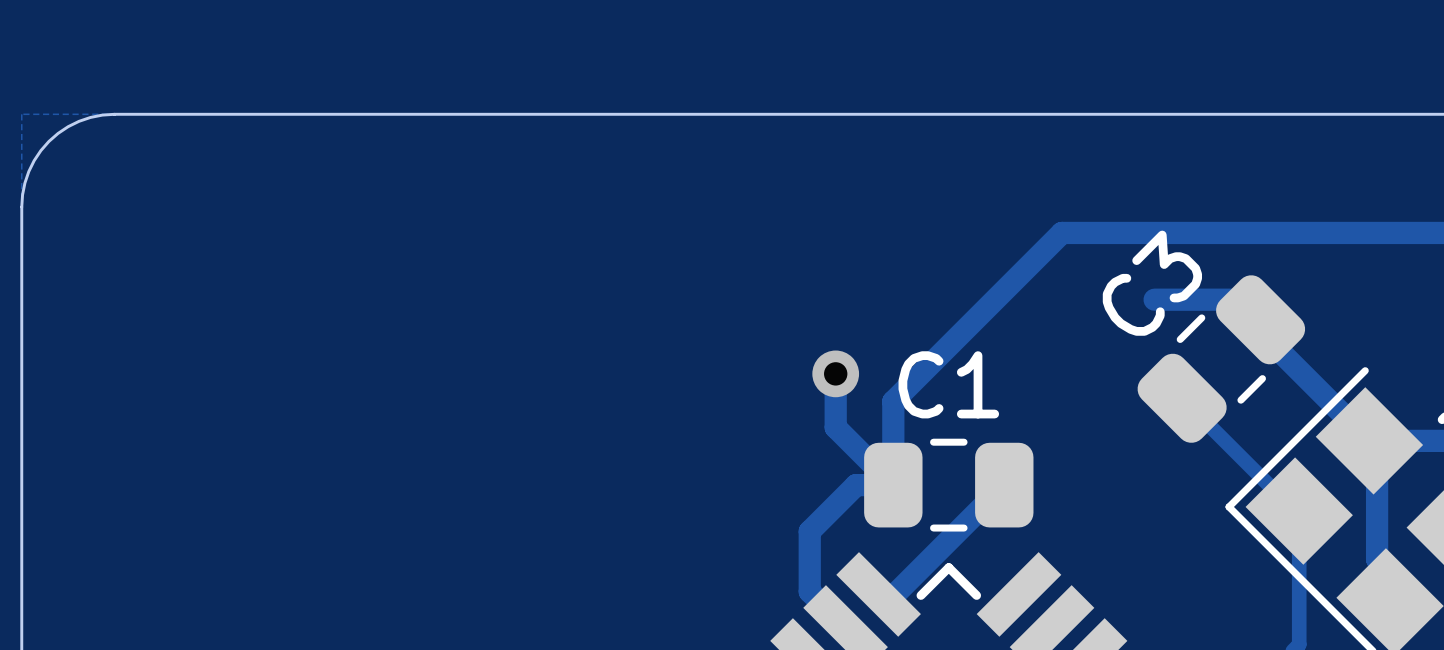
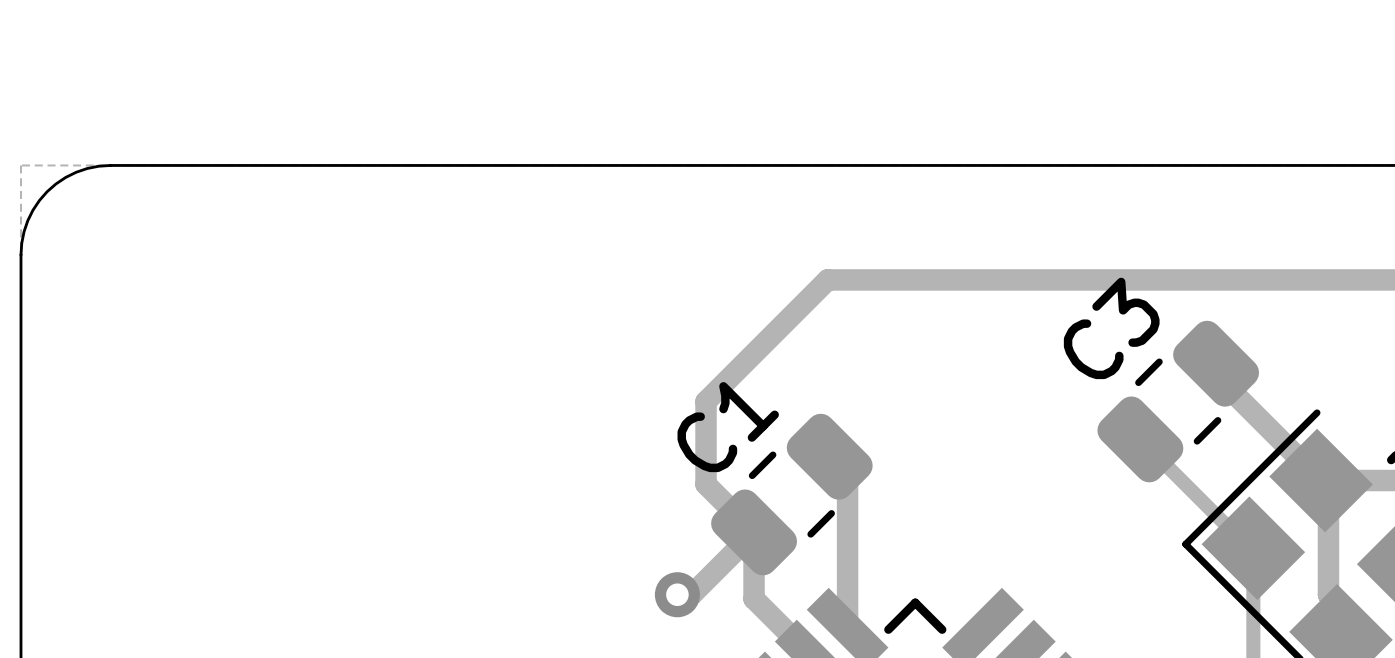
track: (1061, 232) (893, 401) (893, 485) -> (1024, 279) (827, 279) (706, 401) (706, 484) (754, 532)
track: (1154, 299) (1243, 299) (1260, 316) (1260, 319) -> none
track: (835, 373) (835, 427) (893, 485) -> none
via position: (835, 373) -> (677, 594)
track: (893, 485) (856, 485) (809, 531) (809, 591) -> (754, 532) (754, 598) (781, 625)
C1 rotation: 0° (948, 485) -> 45° counterclockwise (791, 494)
C1 position: (948, 485) -> (791, 494)
track: (1004, 485) (894, 594) (878, 594) -> (829, 456) (847, 474) (847, 628)
track: none -> (754, 532) (691, 594) (677, 594)

